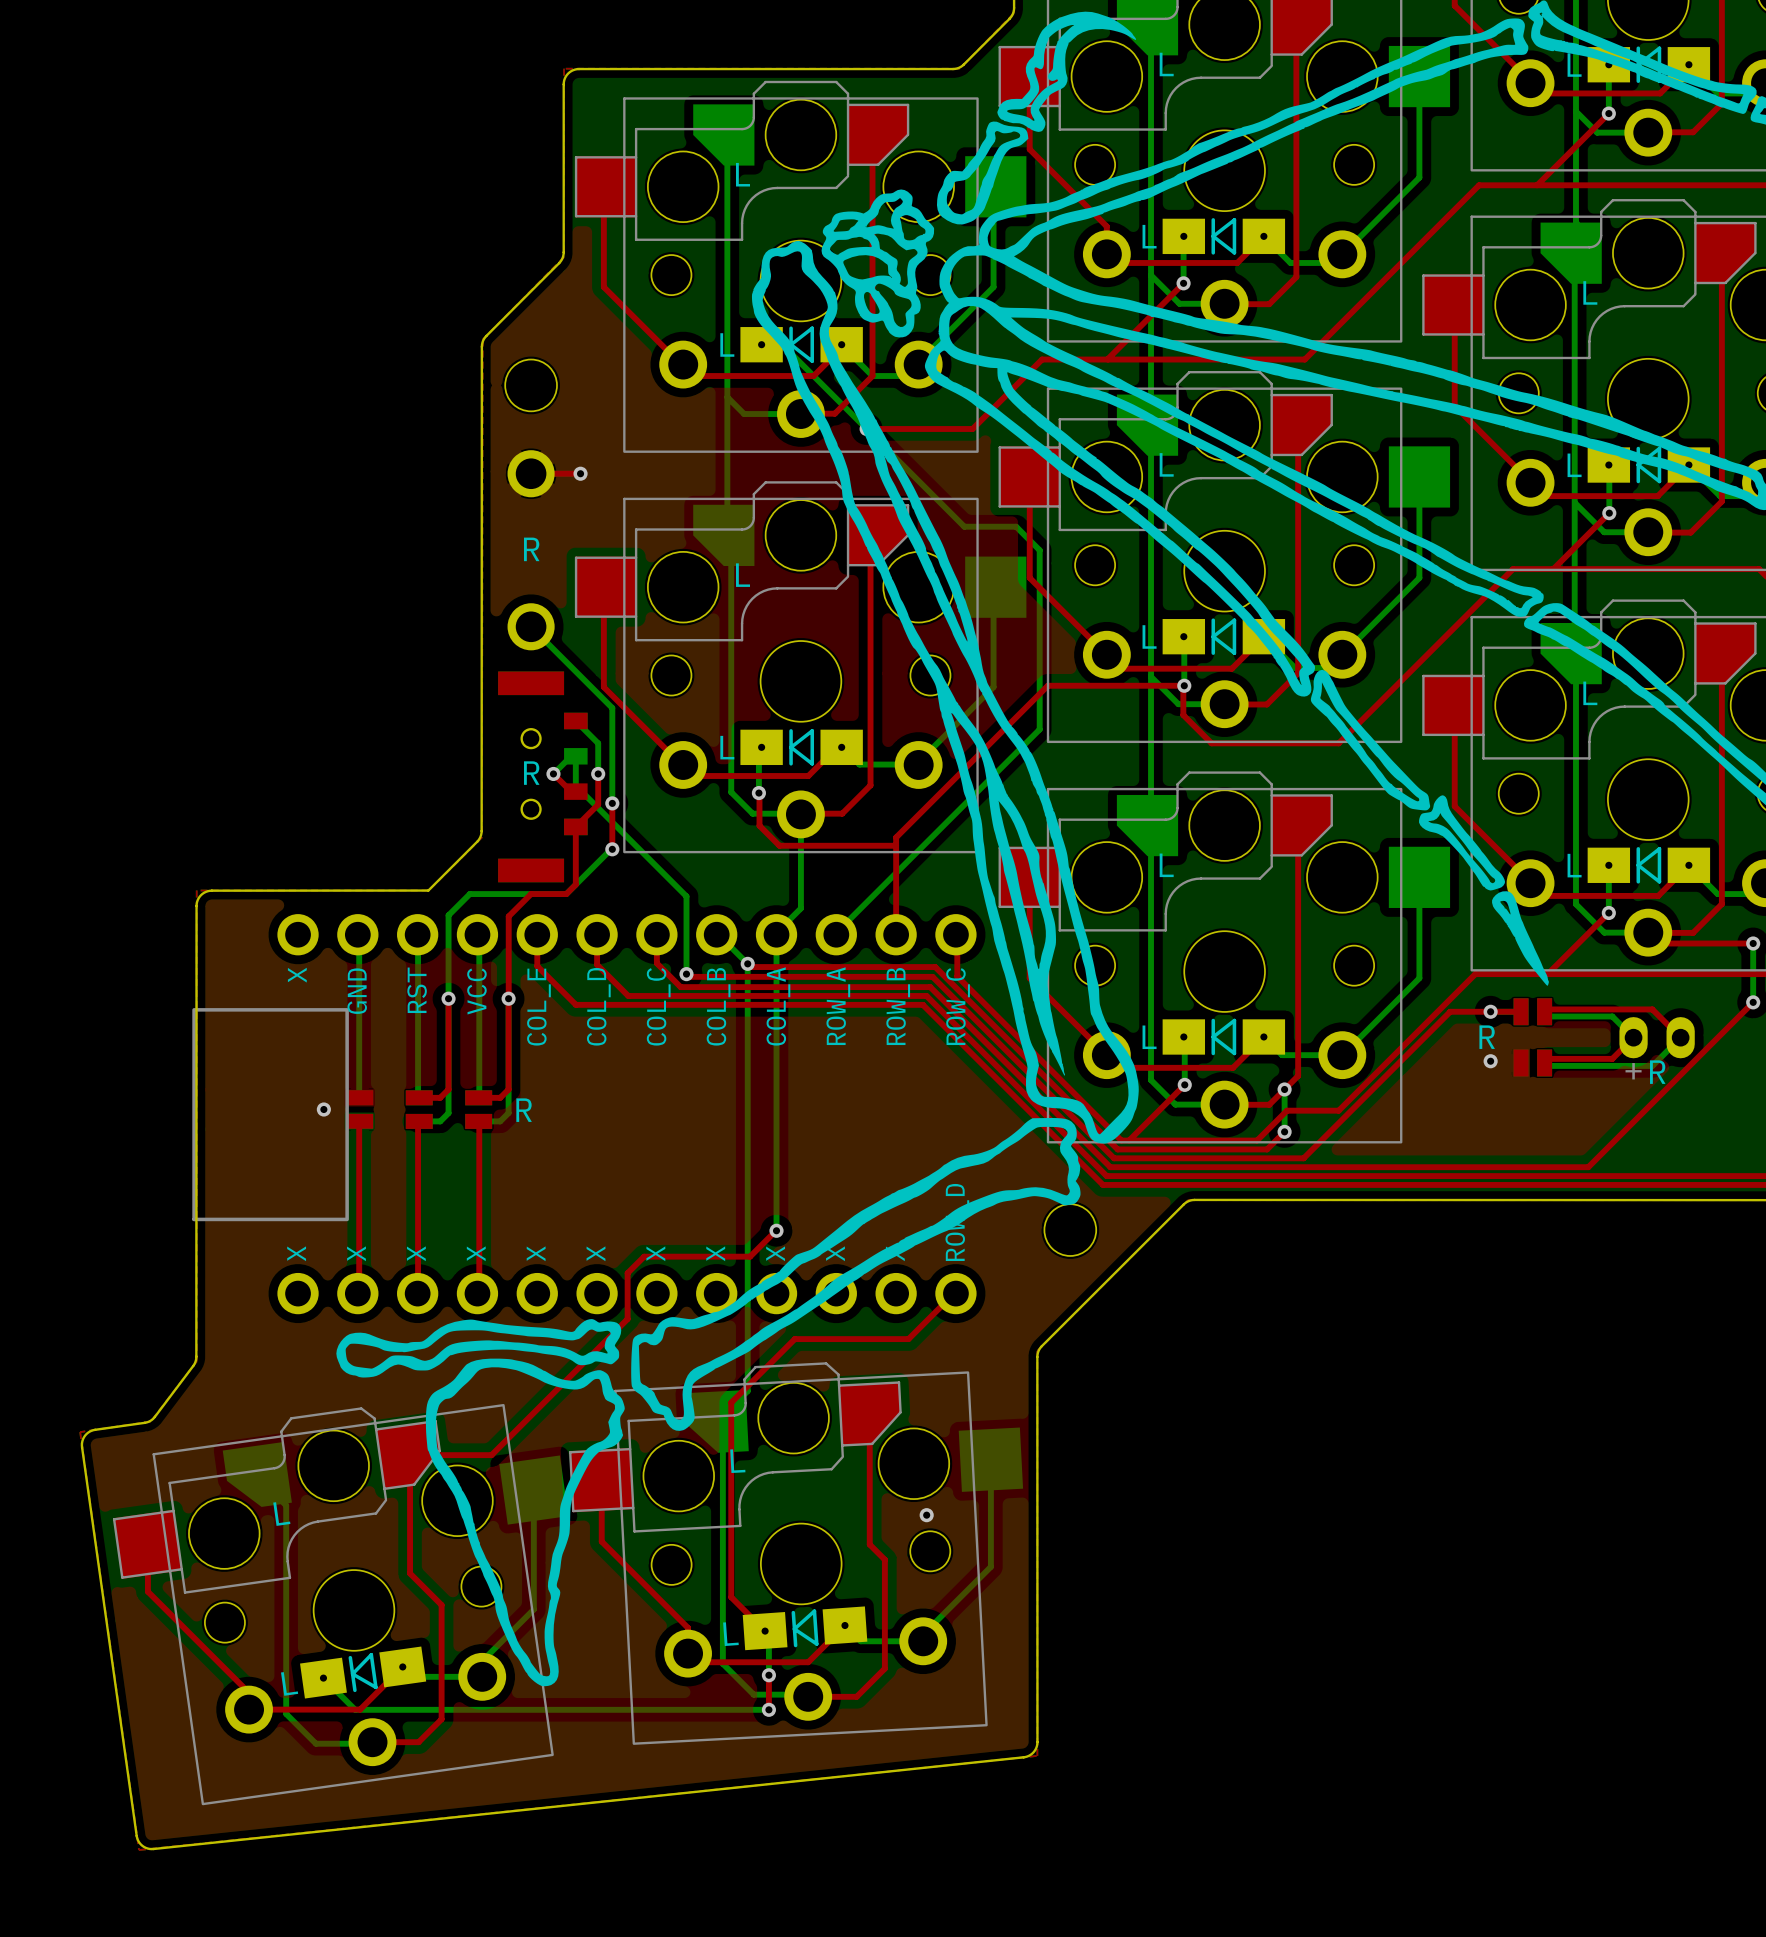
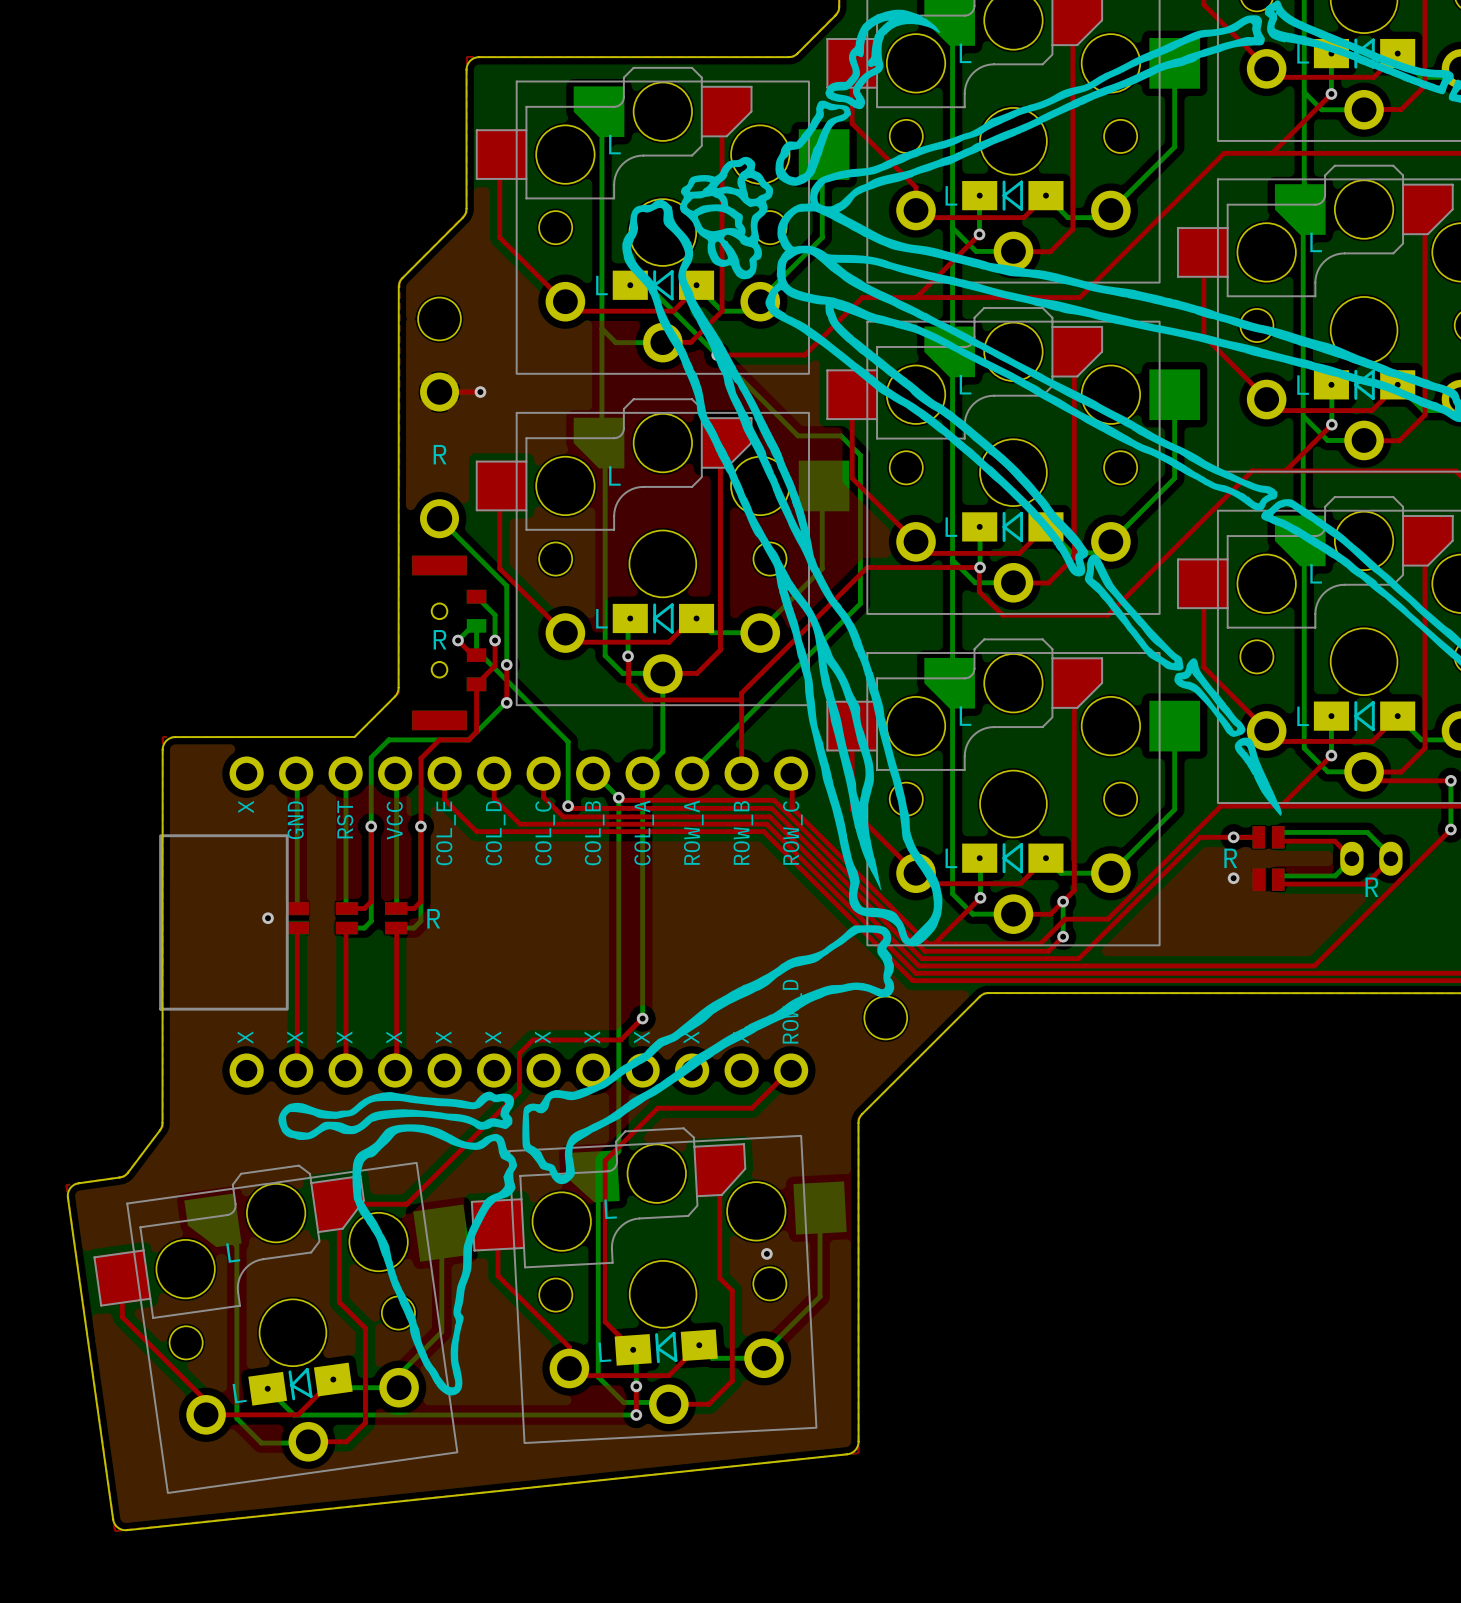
top track: (1544, 1011) (1546, 1009) (1652, 1009) (1680, 1037) -> (1278, 879) (1282, 884) (1365, 884) (1391, 858)
bottom track: (1544, 1011) (1549, 1016) (1612, 1016) (1633, 1037) -> (1278, 875) (1335, 875) (1352, 858)
bottom track: none -> (1278, 837) (1283, 832) (1367, 832) (1391, 856)
top track: (1633, 1037) (1612, 1058) (1548, 1058) (1544, 1063) -> (1352, 858) (1334, 841) (1278, 841)
bottom track: (1680, 1037) (1652, 1065) (1547, 1065) (1544, 1063) -> none
part text: + (1633, 1071) -> none

